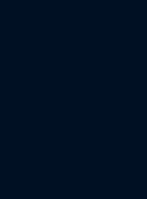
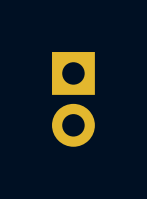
part: none -> (73, 99)

